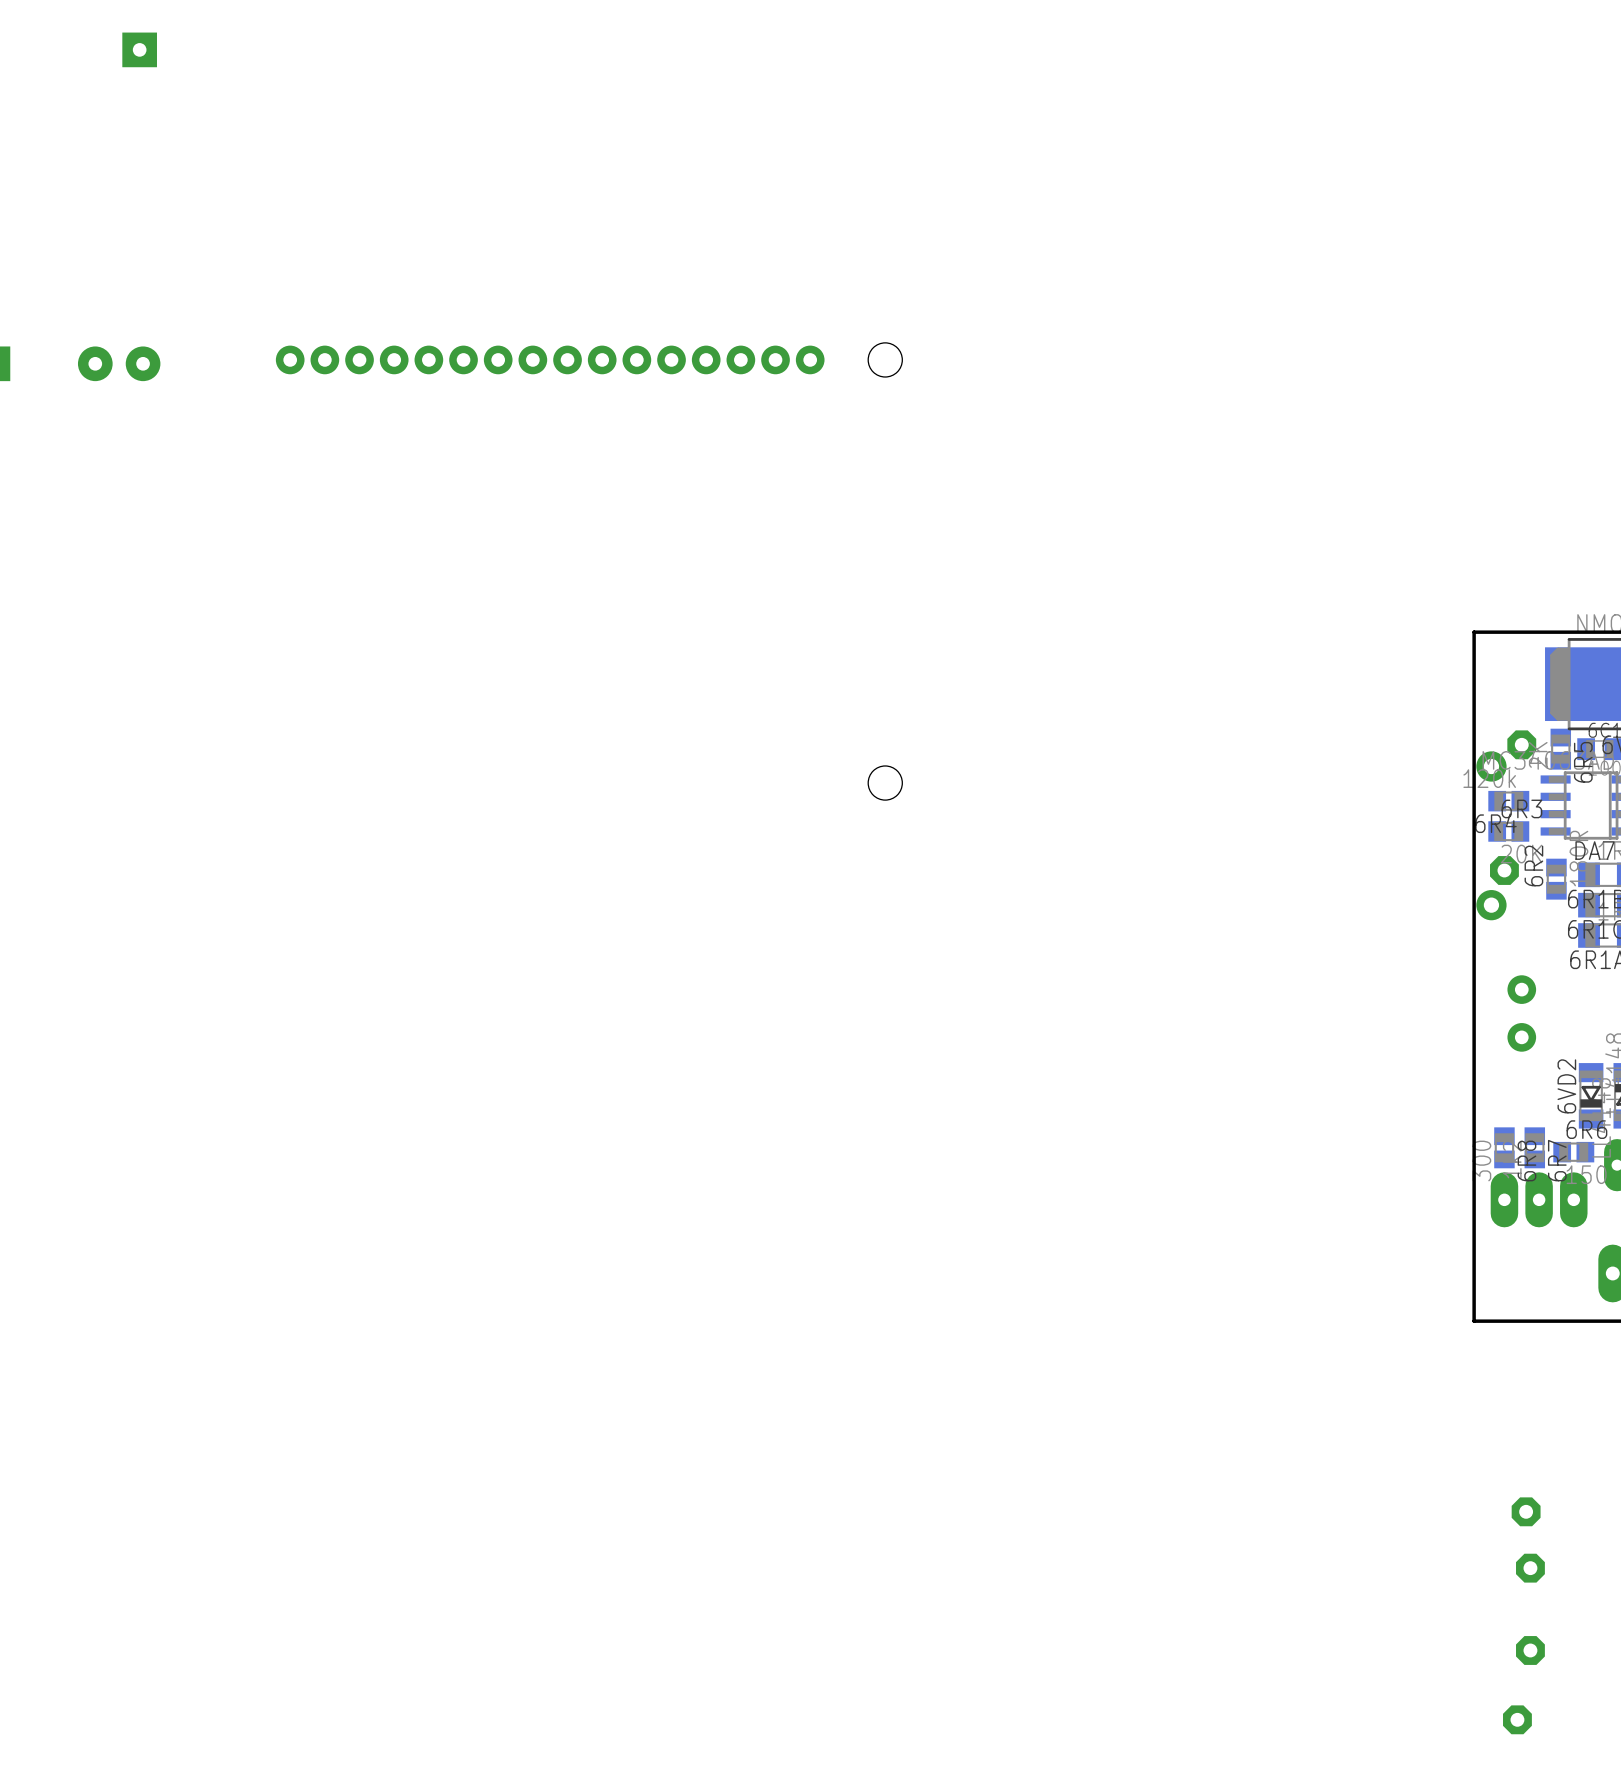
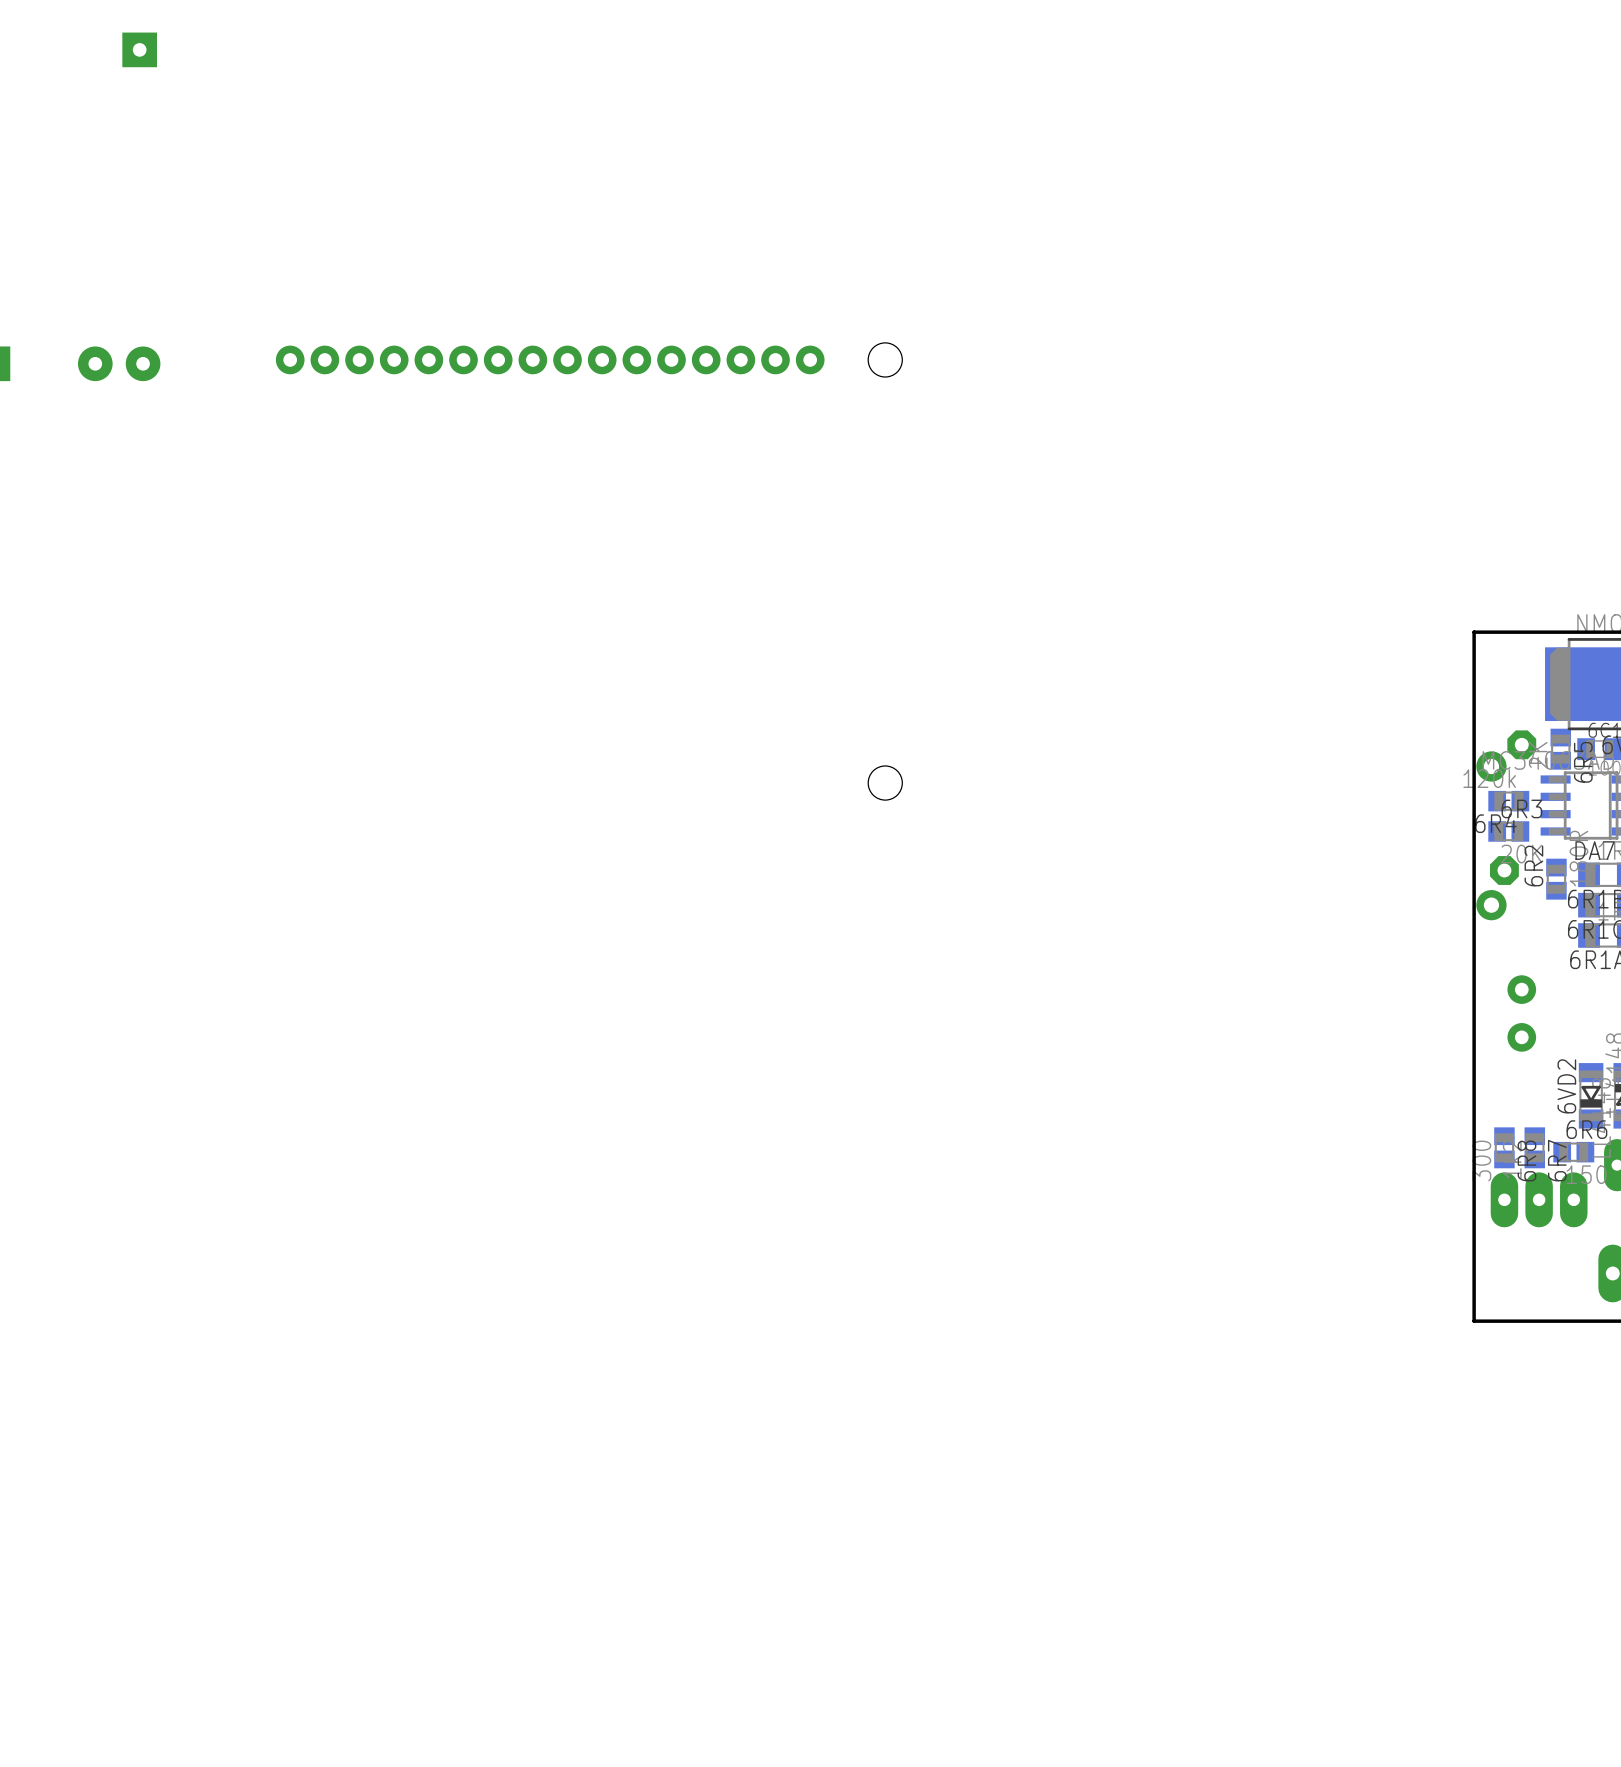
part: (1526, 1511) -> none
part: (1530, 1568) -> none
part: (1530, 1650) -> none
part: (1517, 1719) -> none

